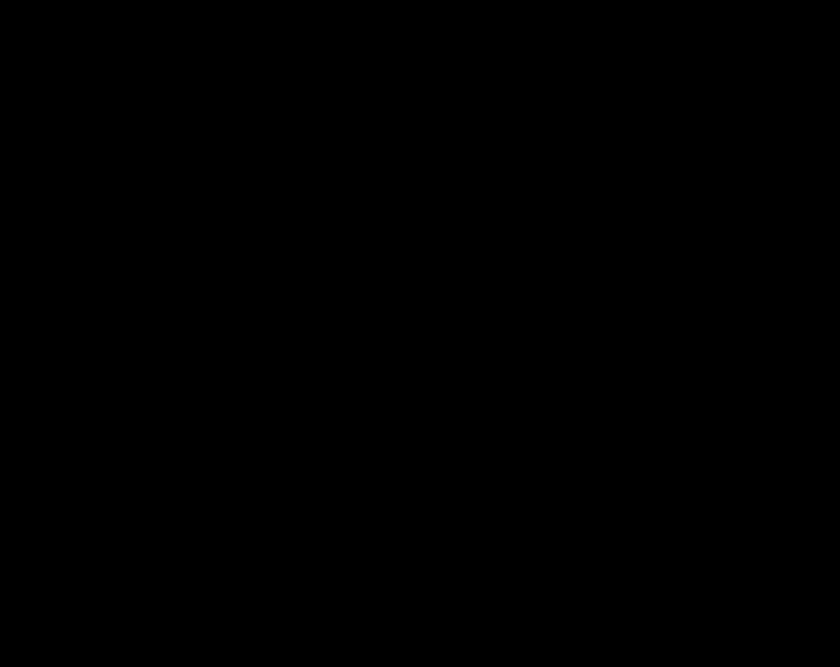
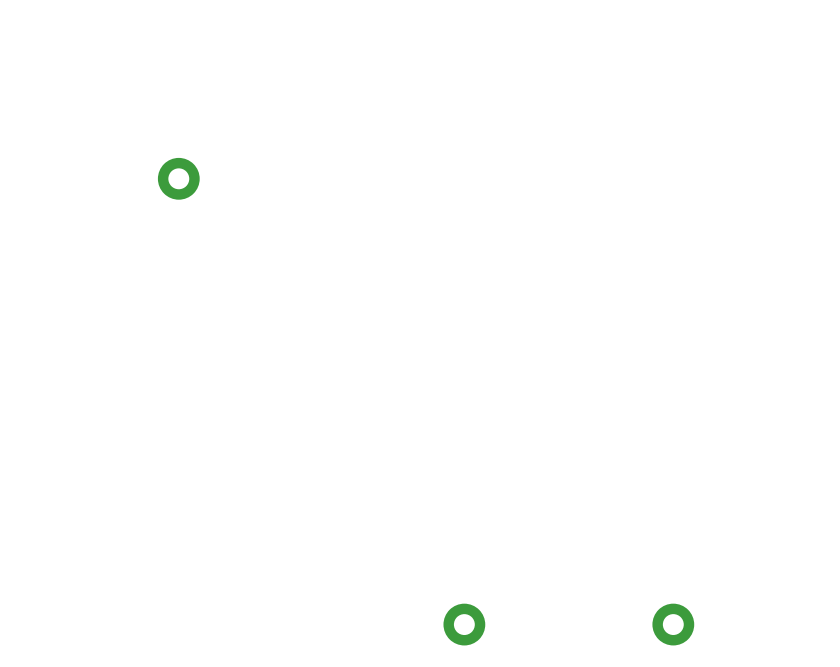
via: none -> (178, 178)
via: none -> (464, 624)
via: none -> (673, 624)

